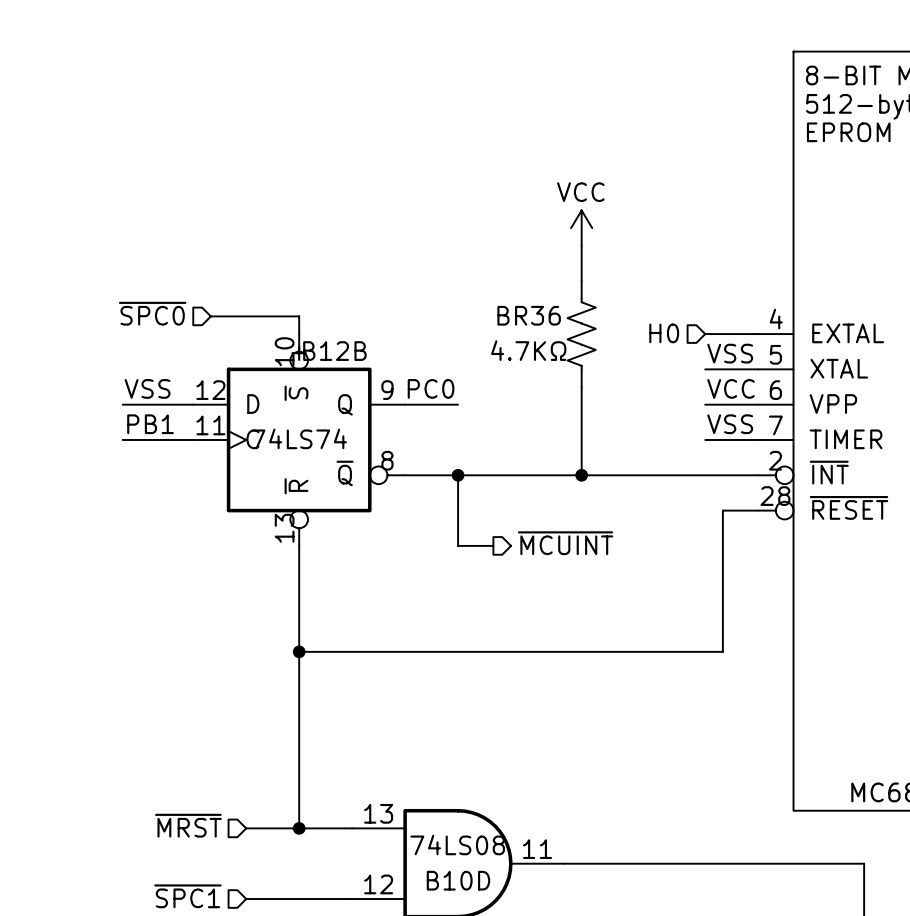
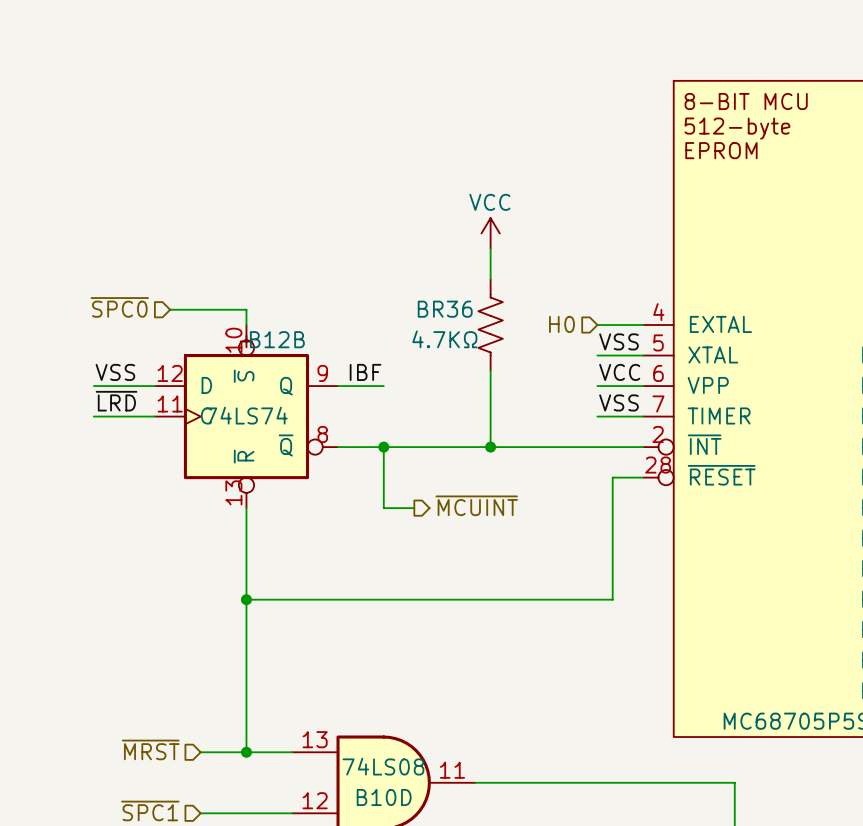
label: PC0 (431, 388) -> IBF (365, 372)
label: PB1 (150, 424) -> ~{LRD} (116, 401)

